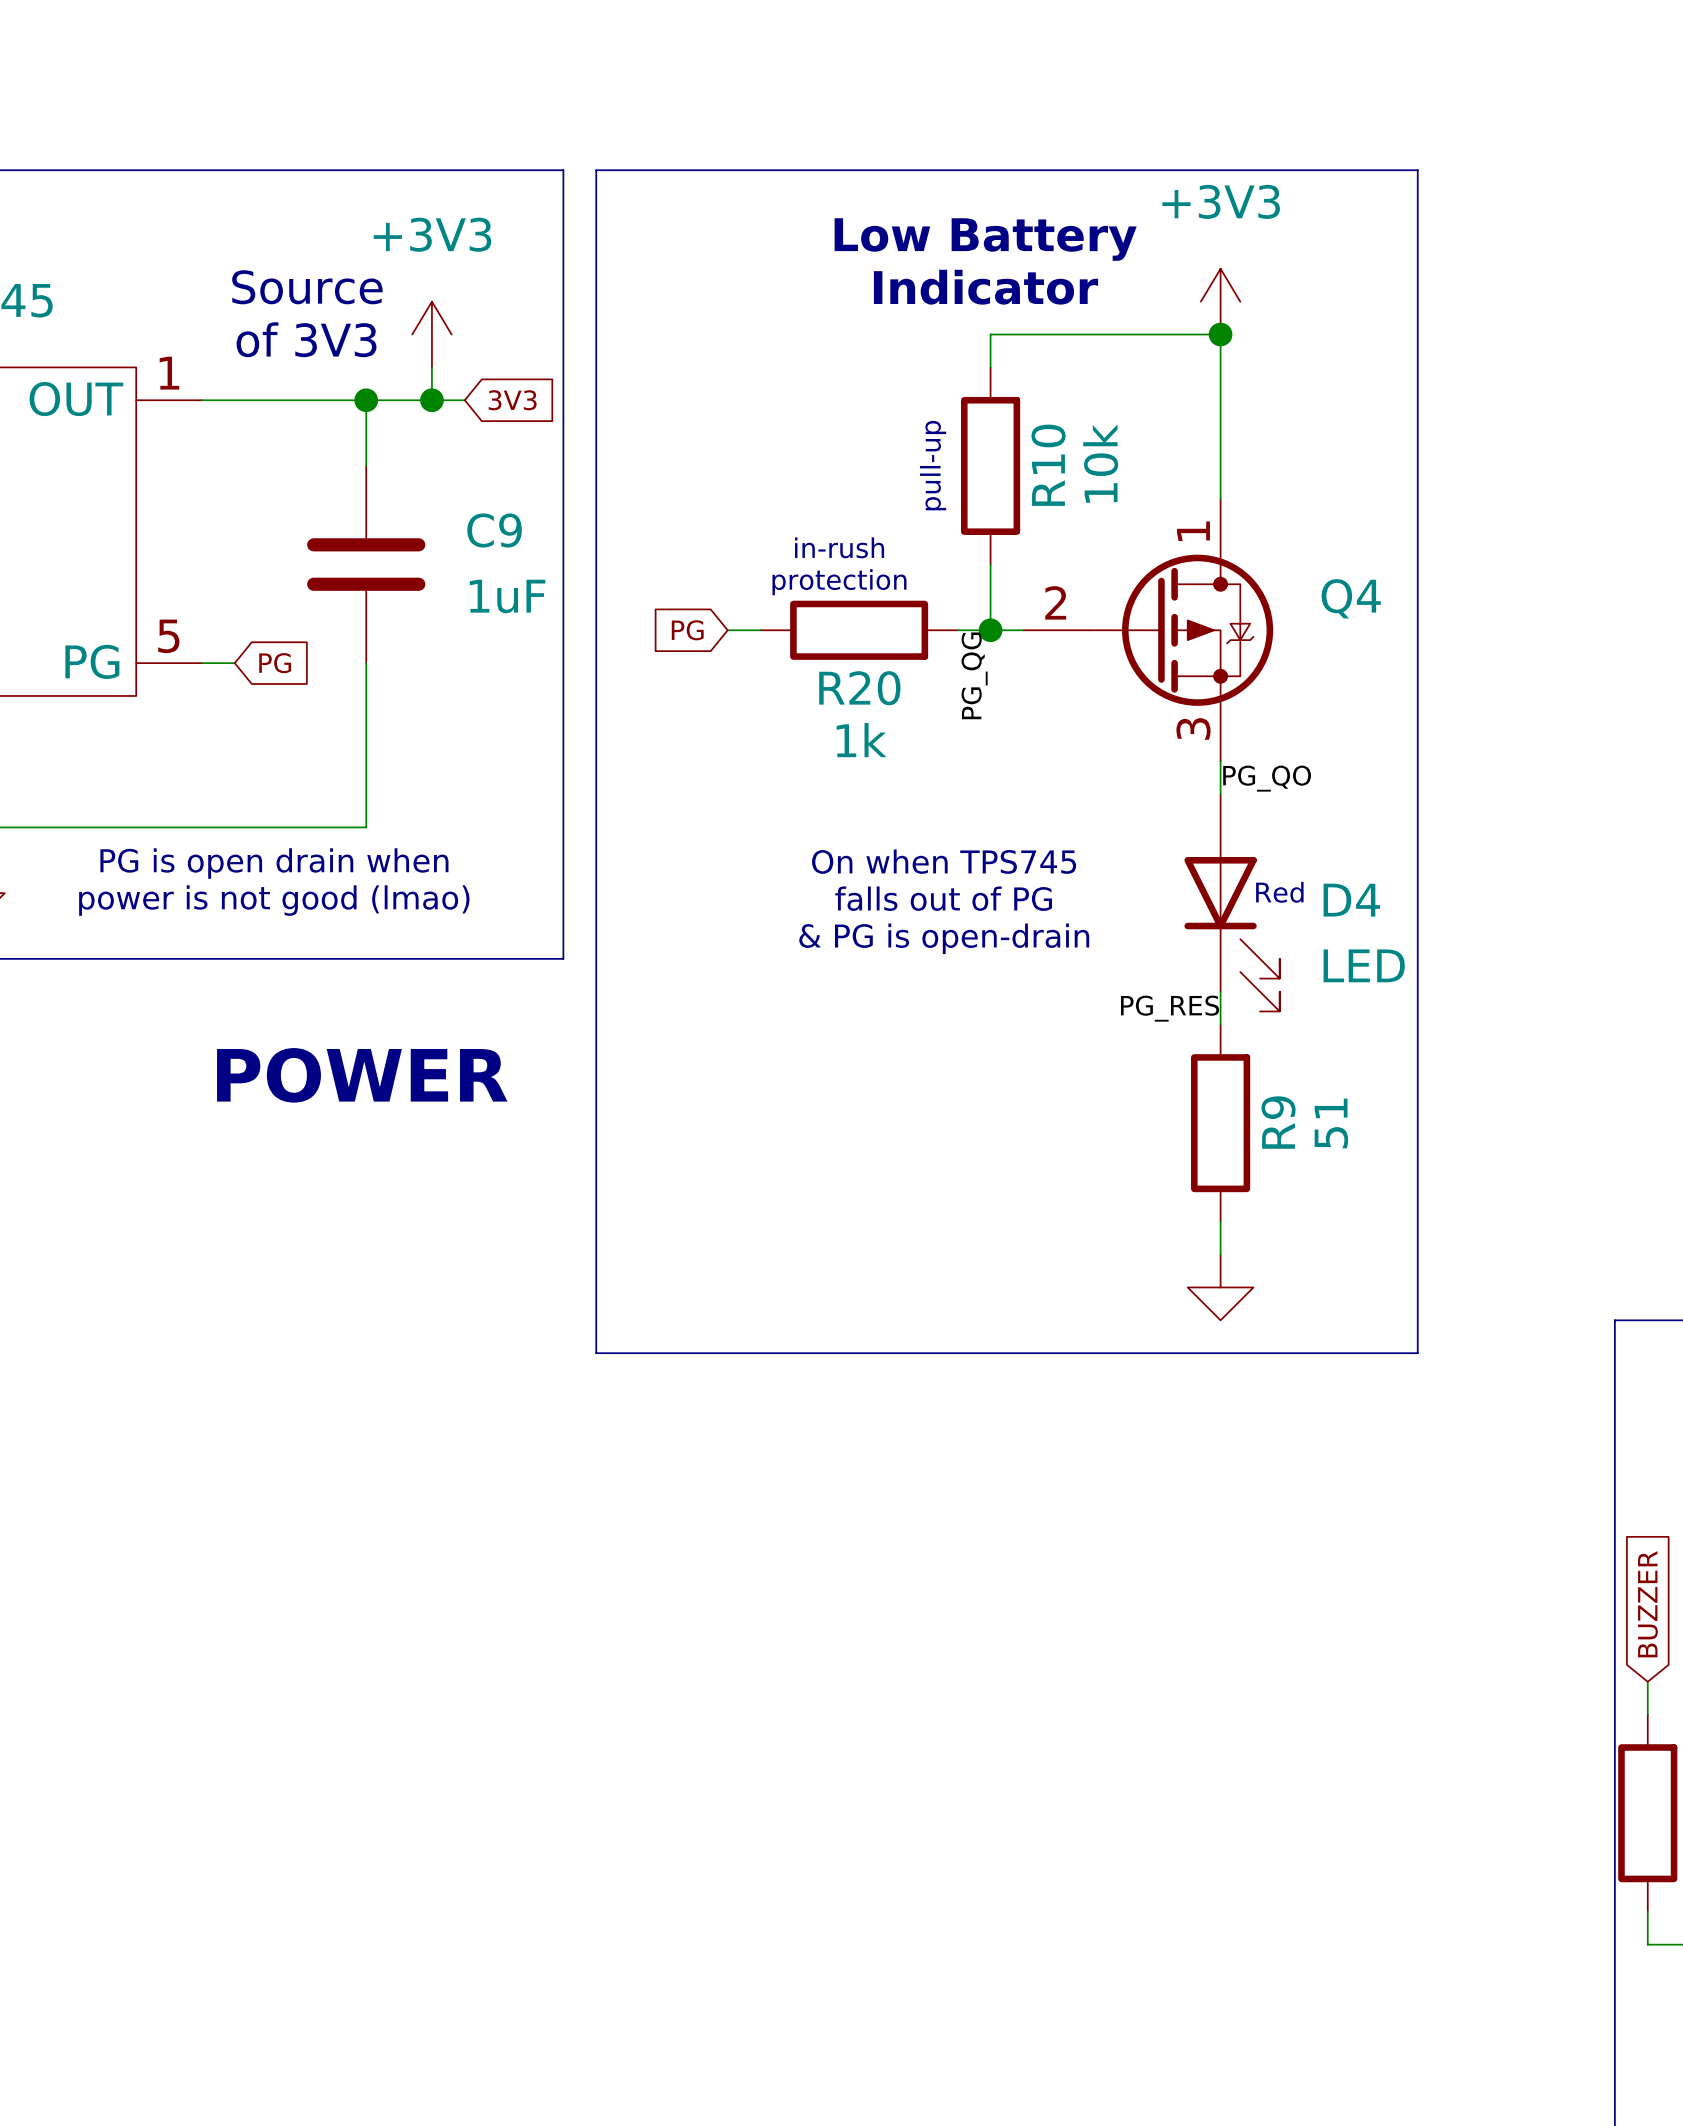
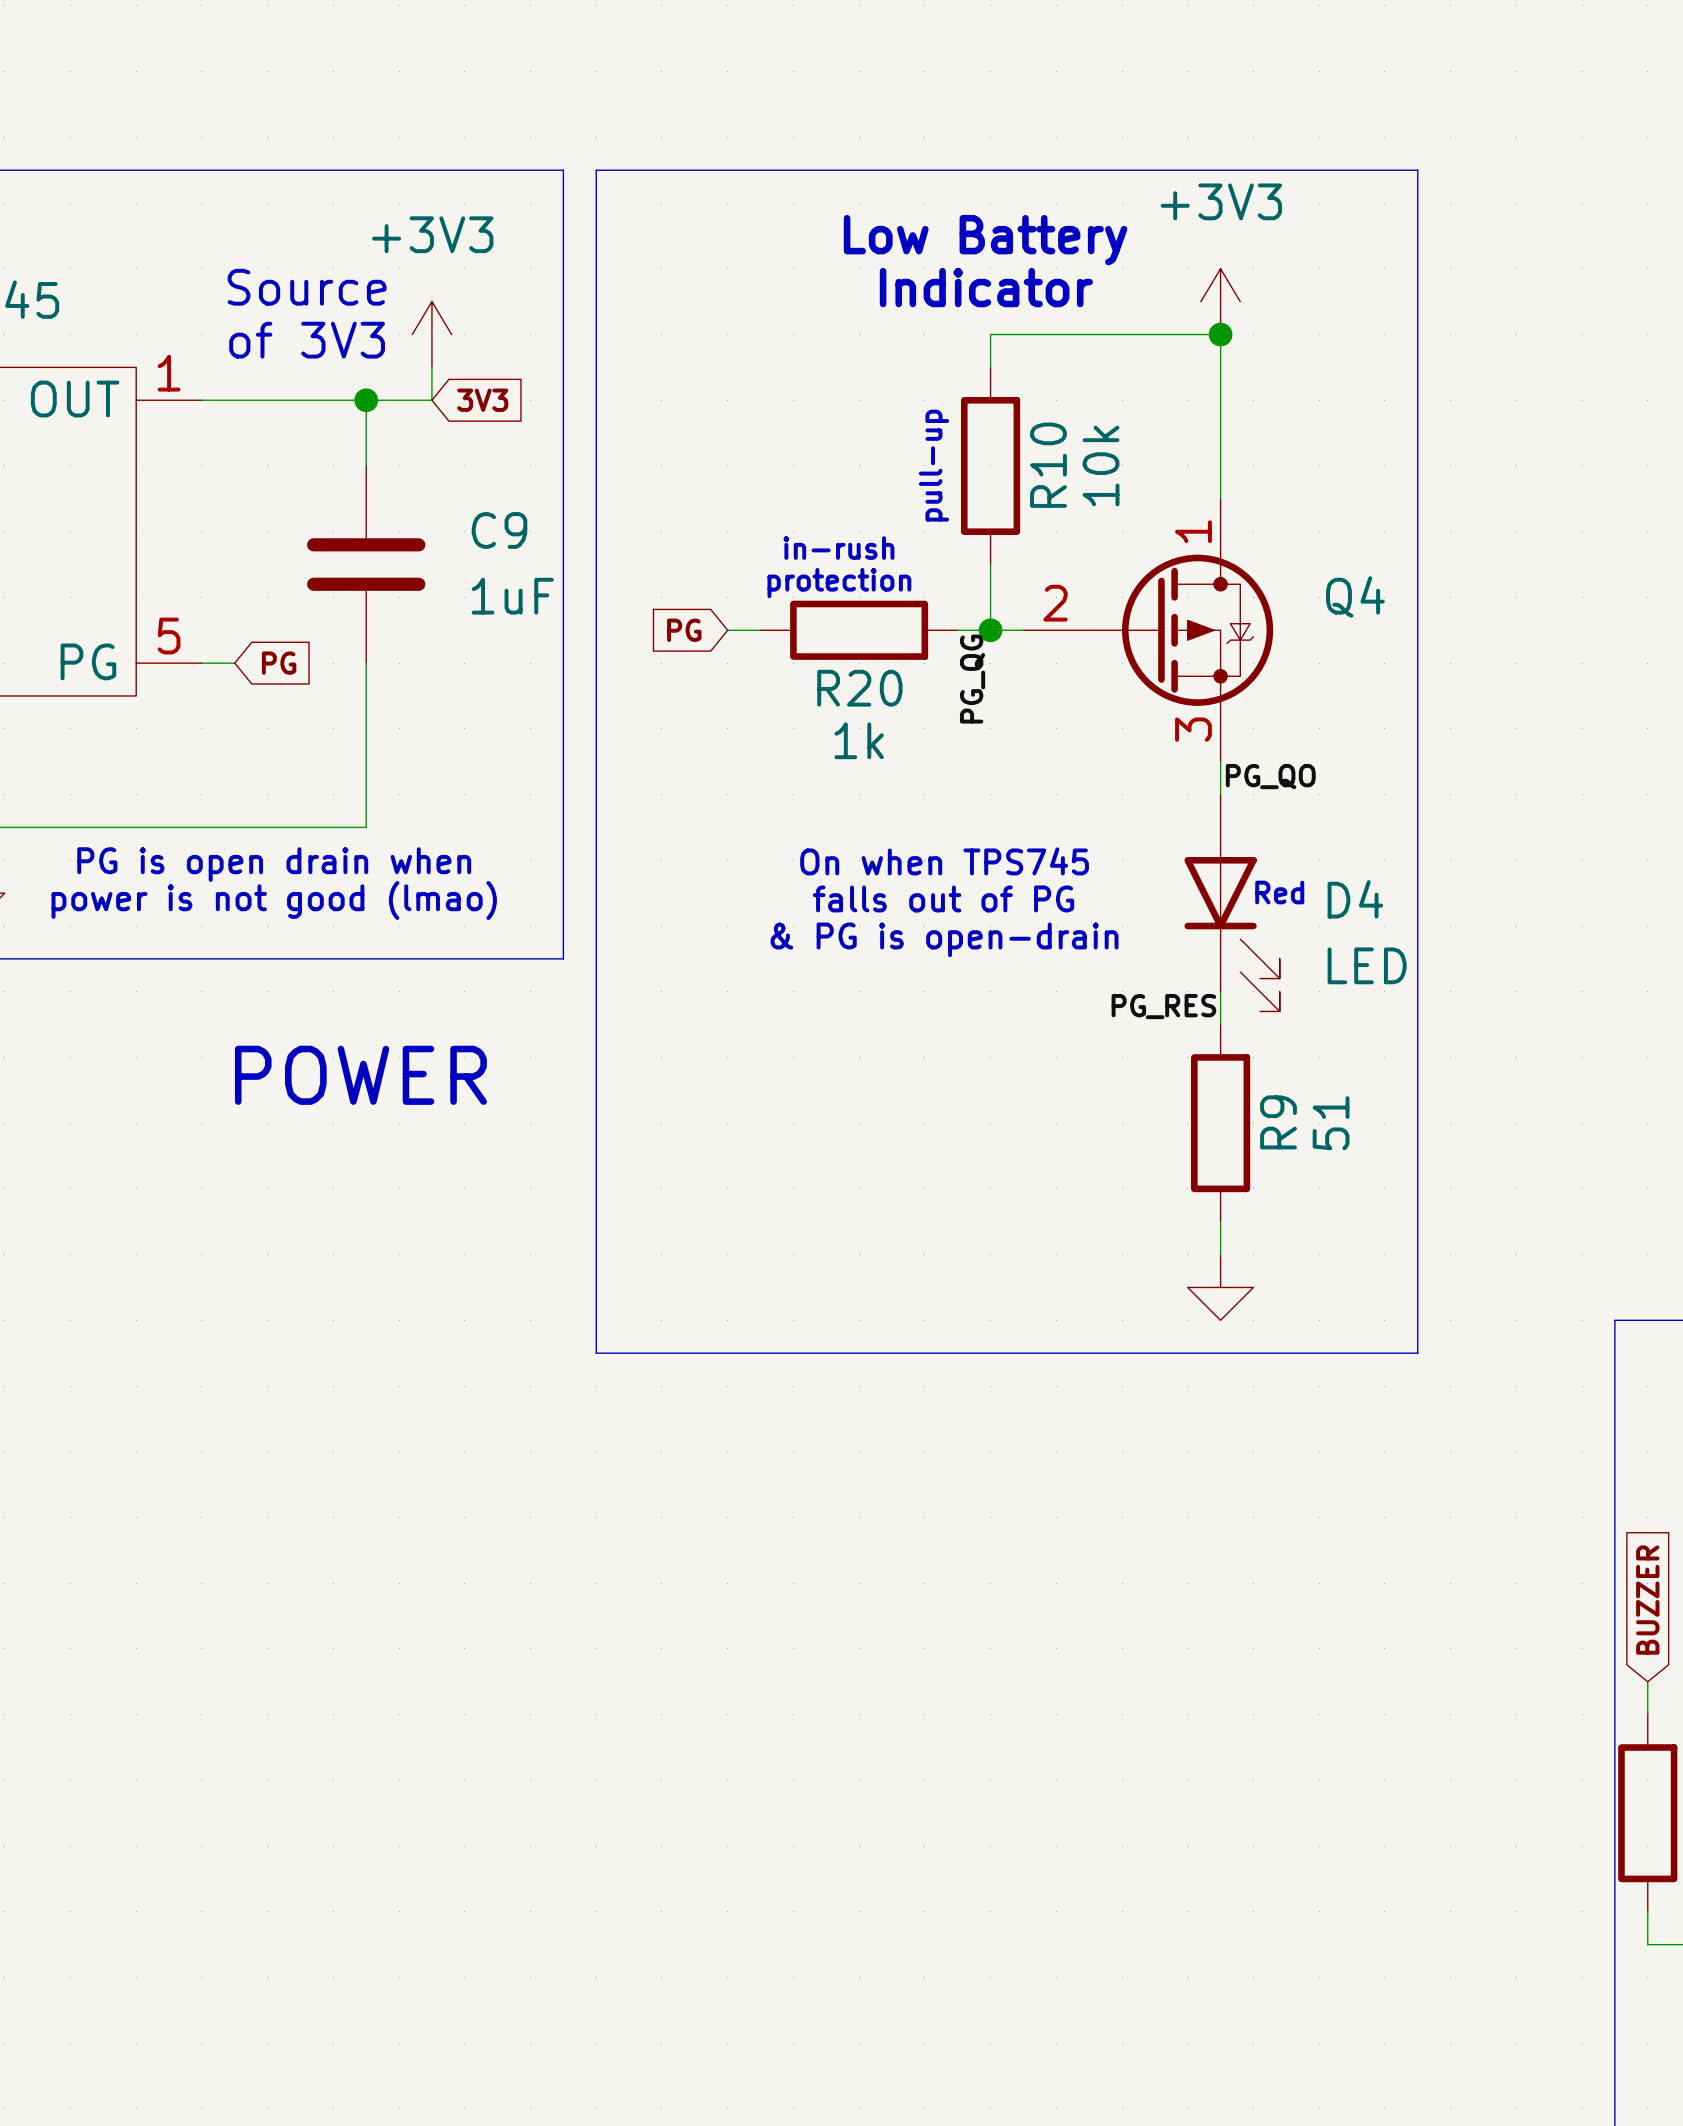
wire: (431, 400) (464, 400) -> none
junction: (431, 400) -> none
global label position: 3V3 (512, 400) -> 3V3 (482, 400)

